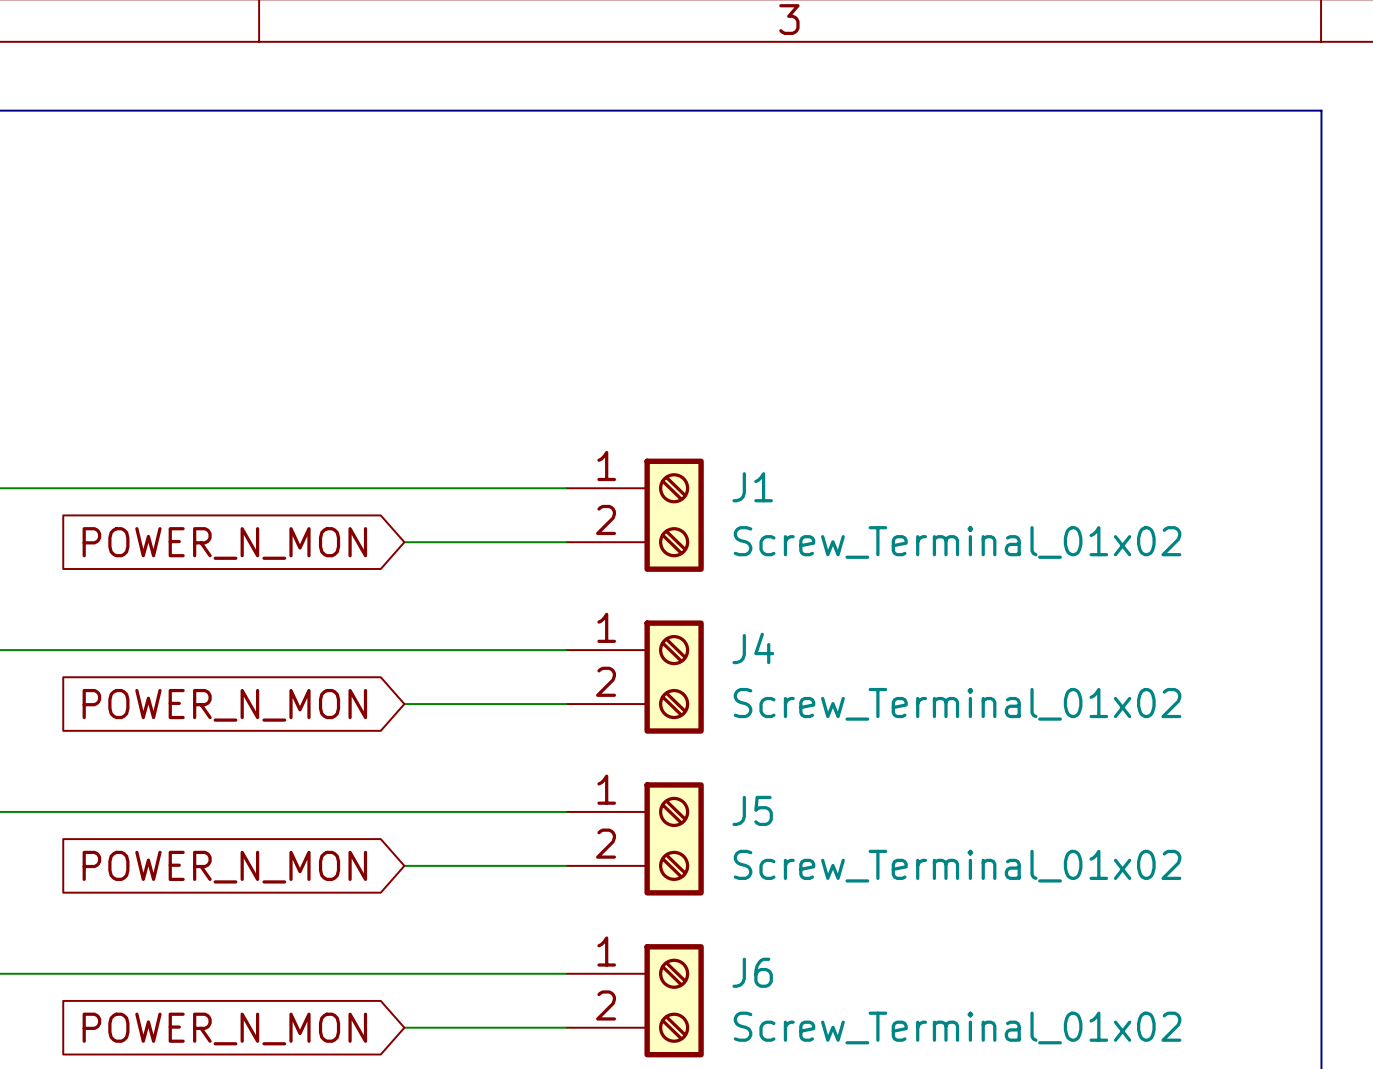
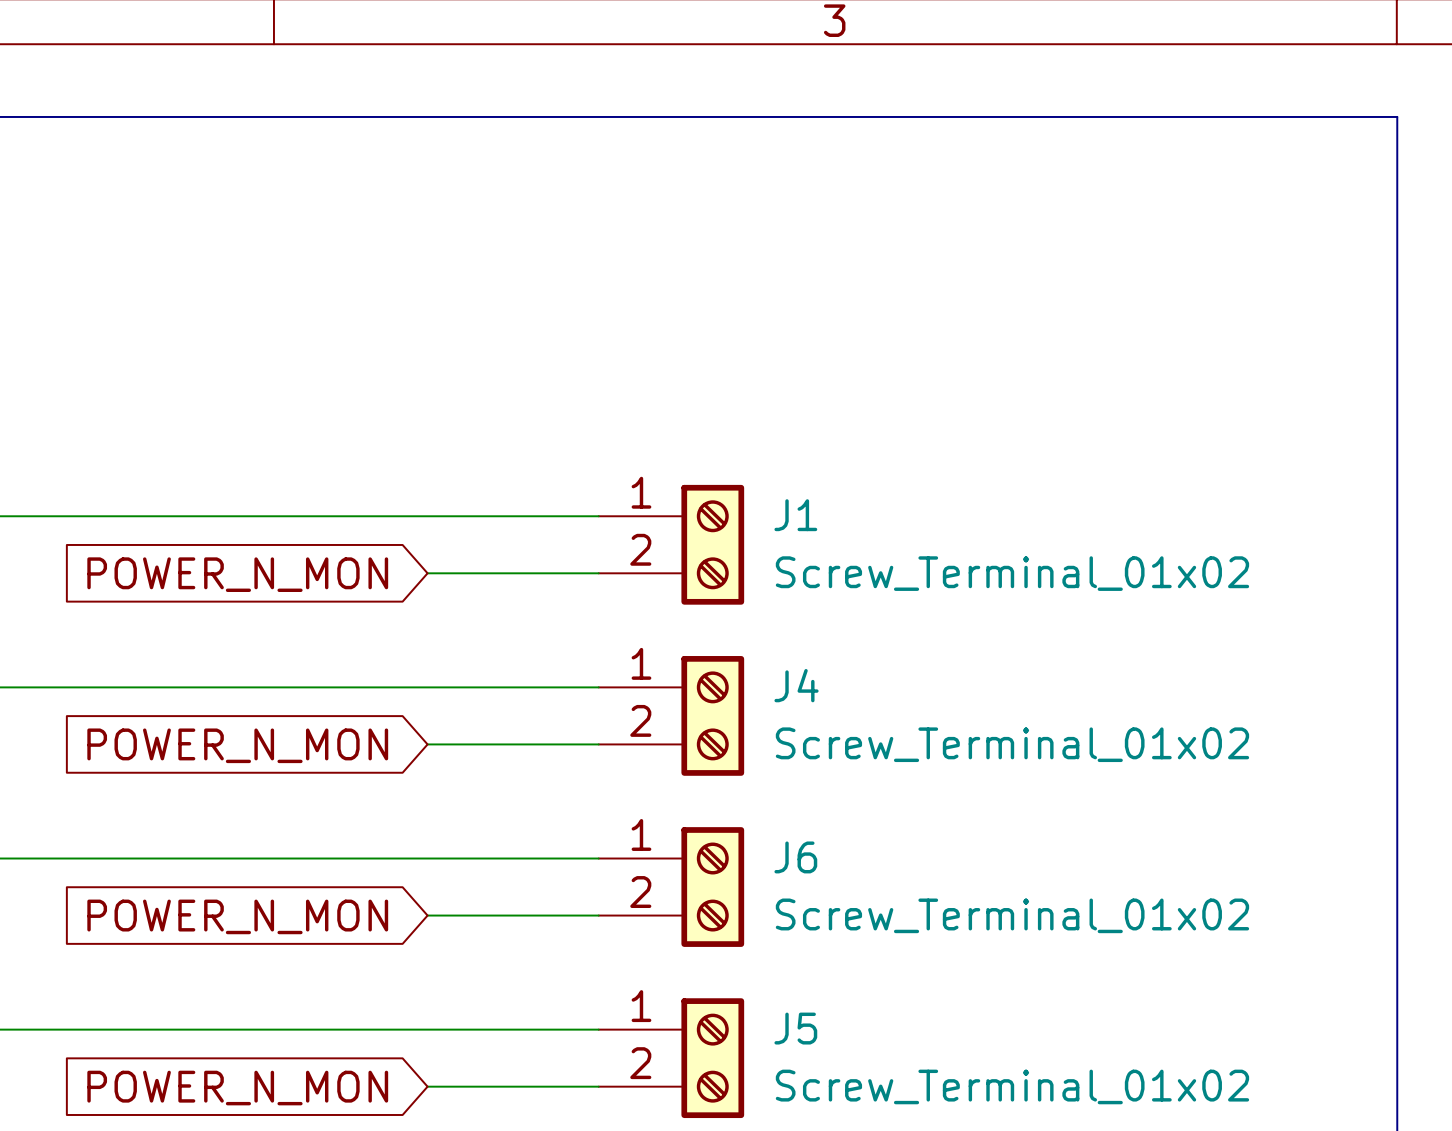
J5 name: J5 (752, 810) -> J6 (795, 857)
J6 name: J6 (752, 972) -> J5 (795, 1028)

